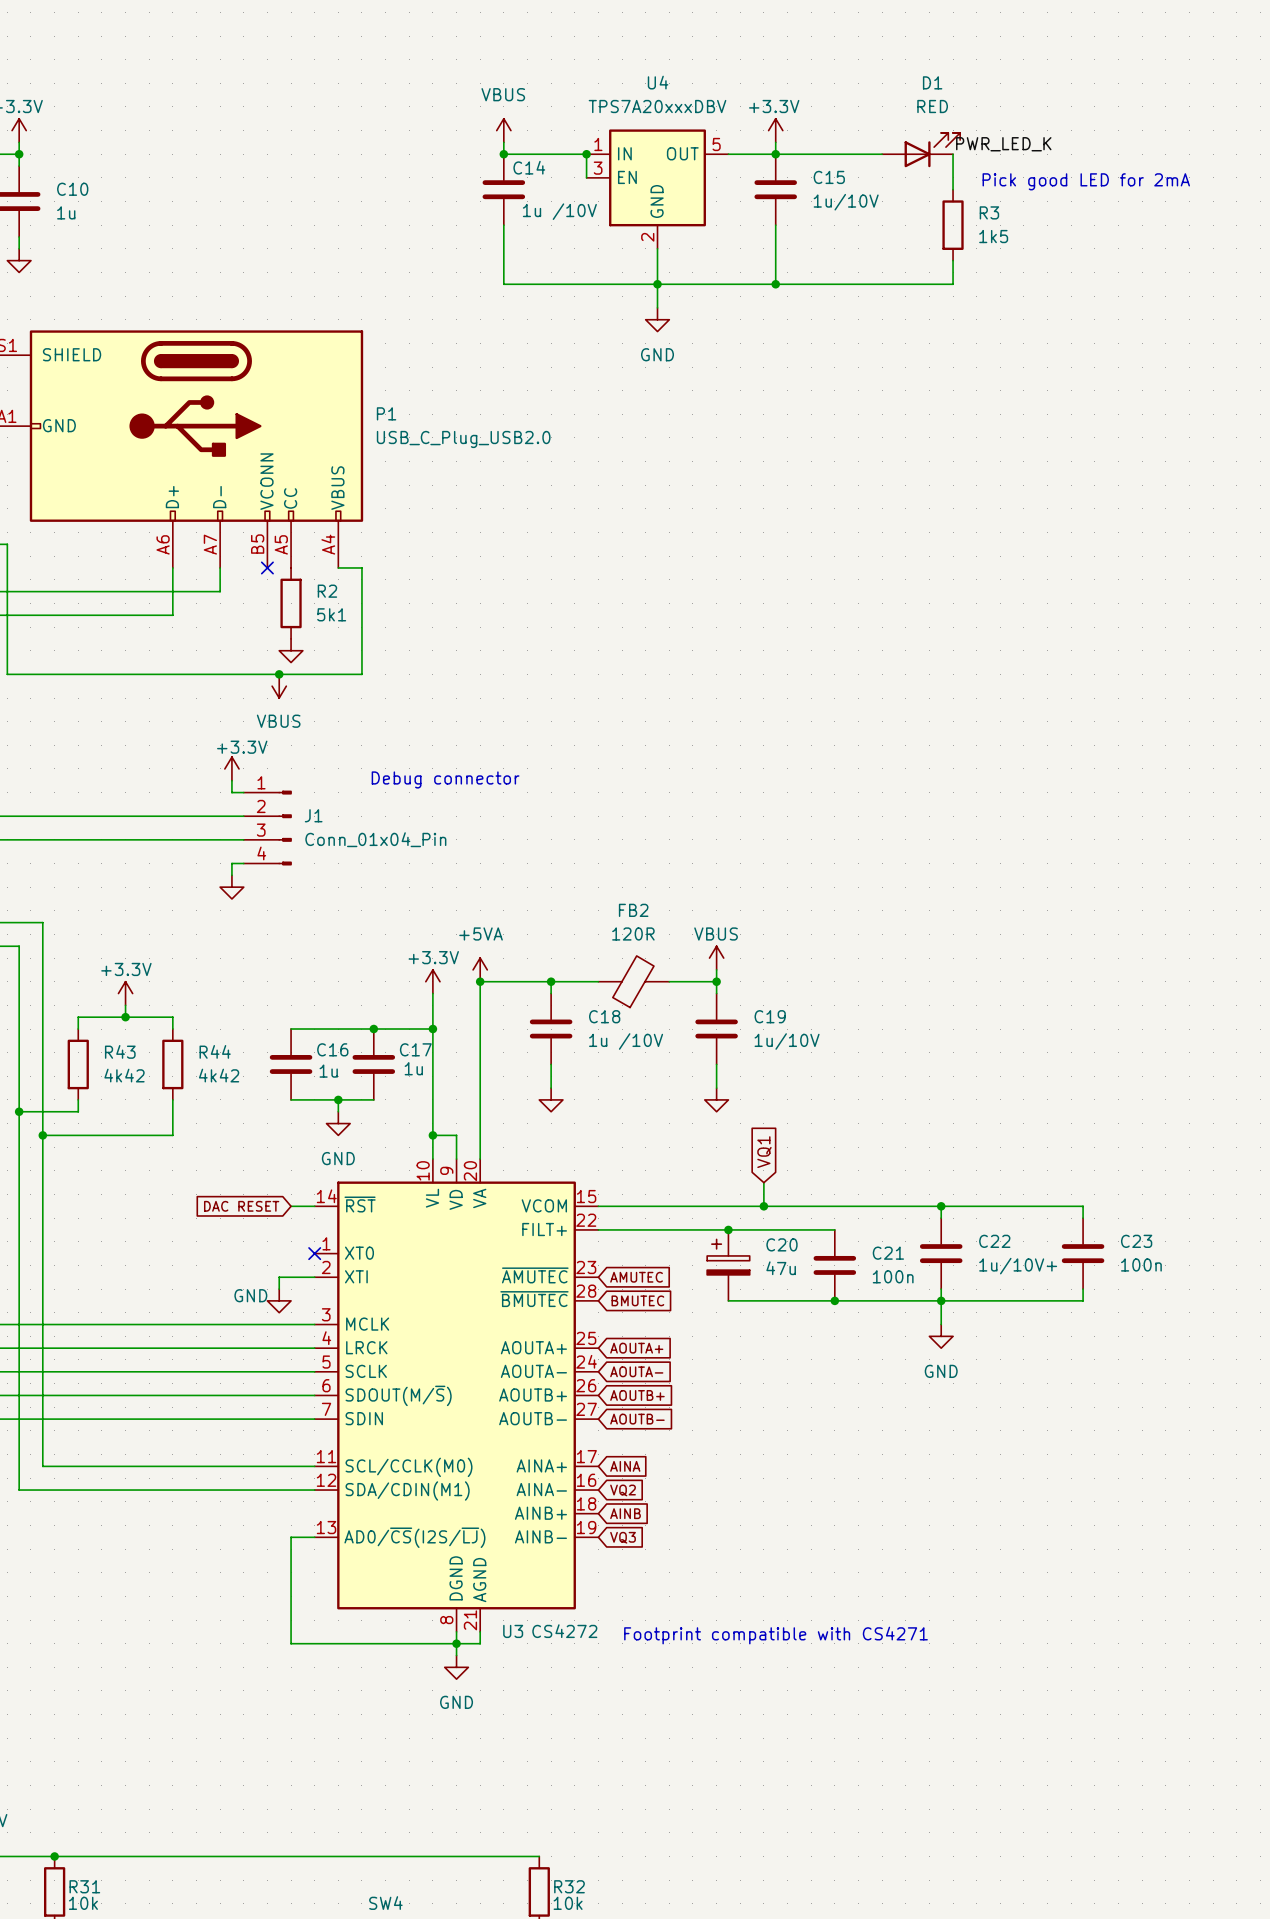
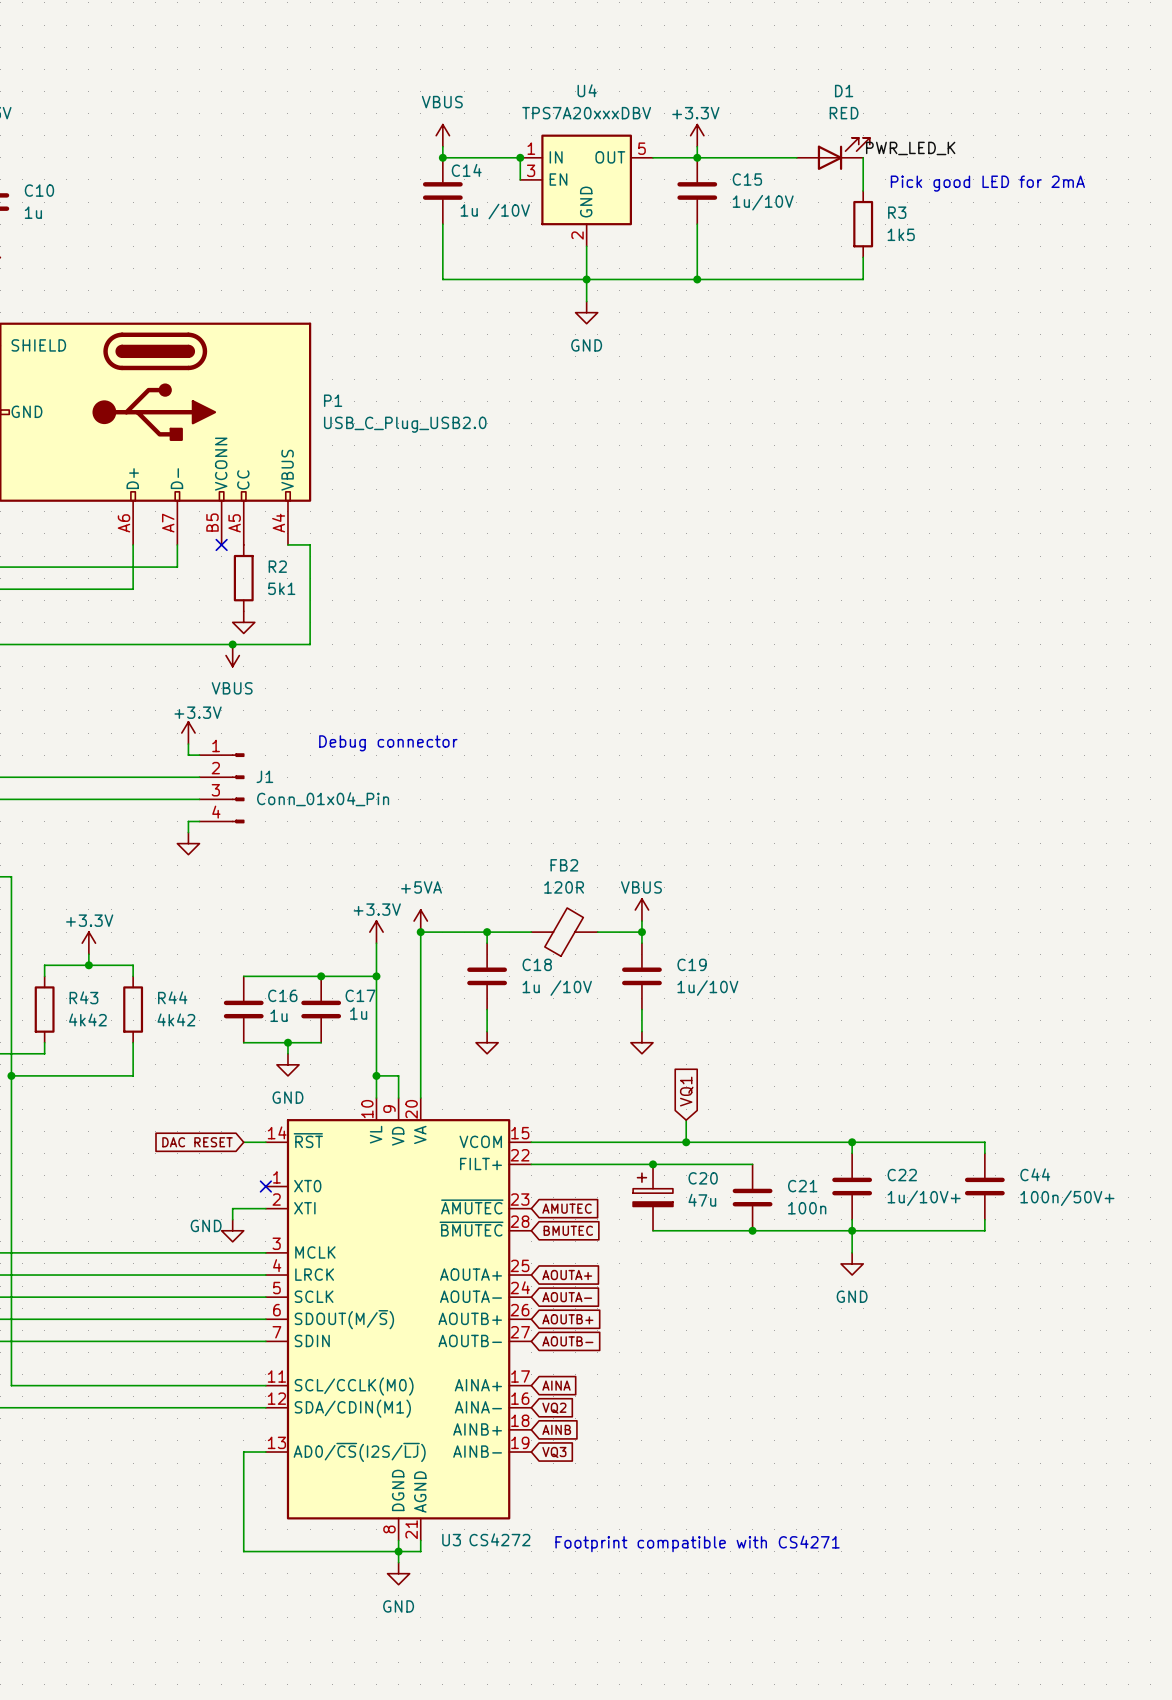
C23 name: C23 (1136, 1241) -> C44 (1035, 1174)
C23 value: 100n (1141, 1264) -> 100n/50V+ (1067, 1198)

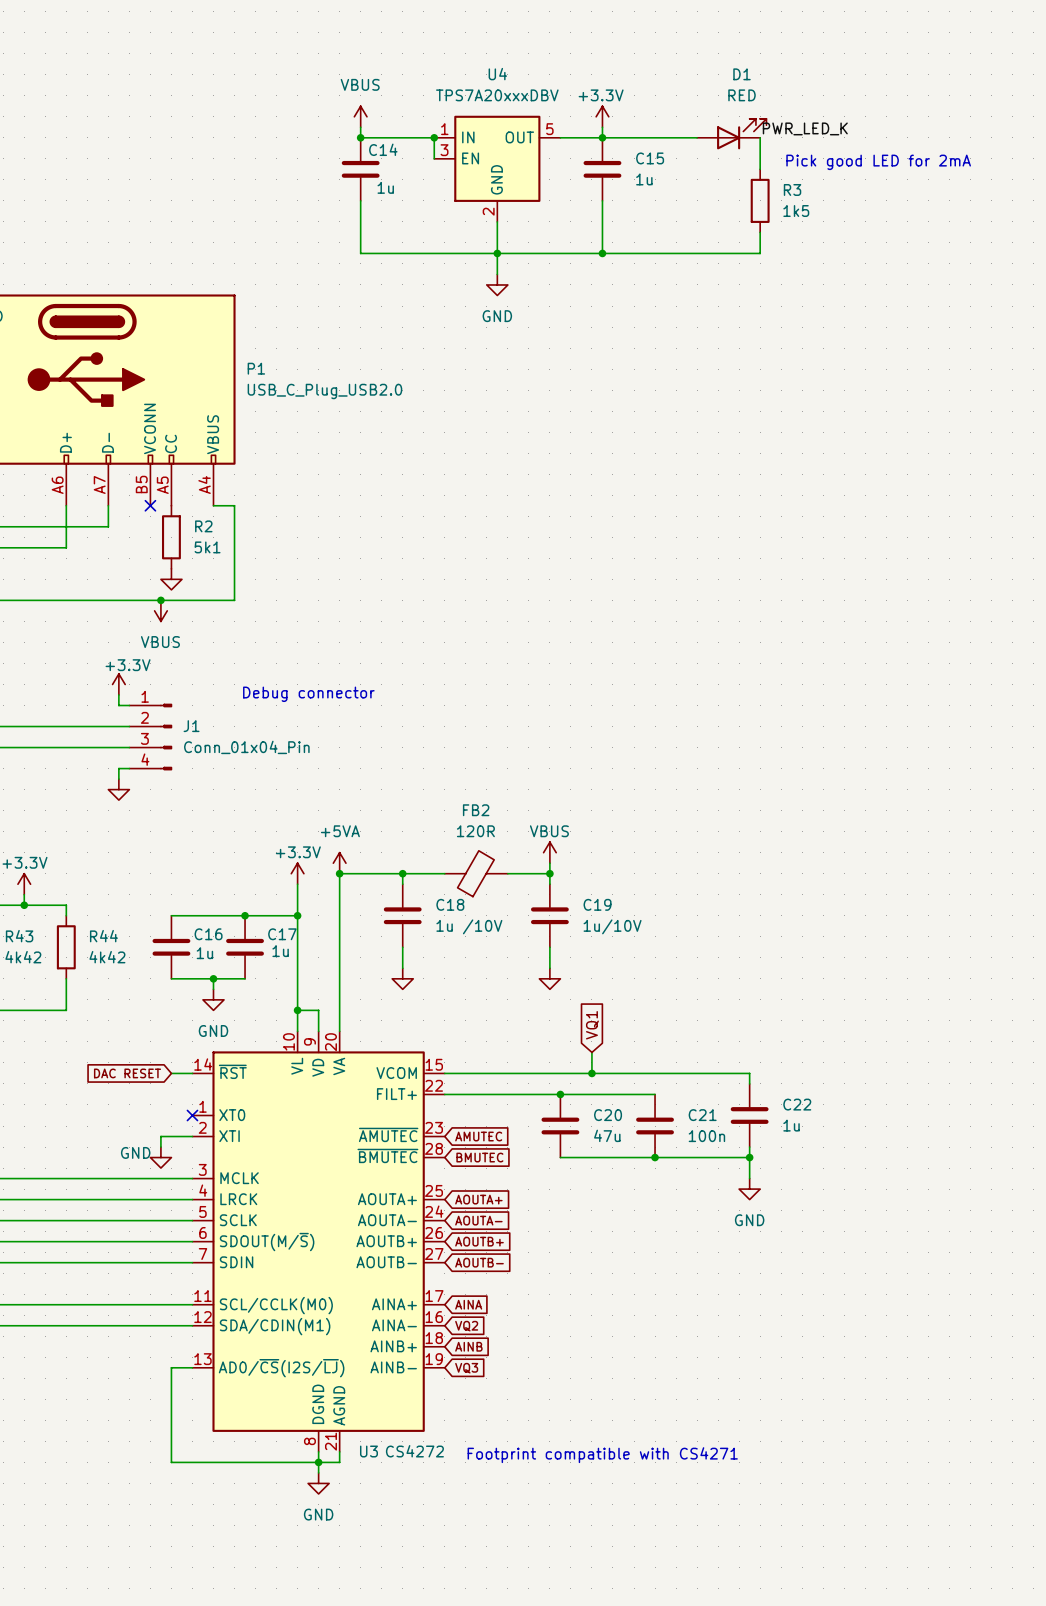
C15 value: 1u/10V (763, 202) -> 1u (644, 179)
C14 value: 1u /10V (495, 211) -> 1u (385, 187)
wire: (852, 1142) (984, 1142) (984, 1153) -> none
junction: (852, 1142) -> none
C20 symbol: [633, 1164, 673, 1231] -> [541, 1094, 580, 1158]
C44: 100n/50V+ (984, 1186) -> none
C22 value: 1u/10V+ (924, 1198) -> 1u (791, 1125)
wire: (984, 1219) (984, 1230) (852, 1230) -> none

